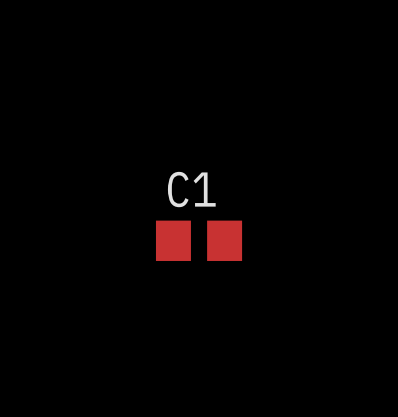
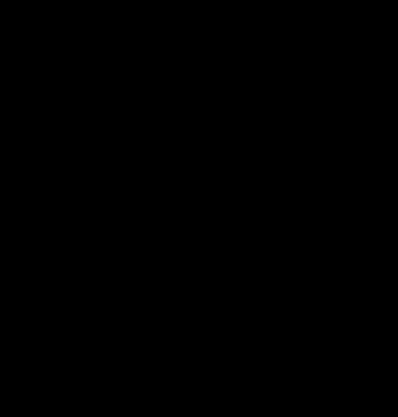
C1: (199, 240) -> none

